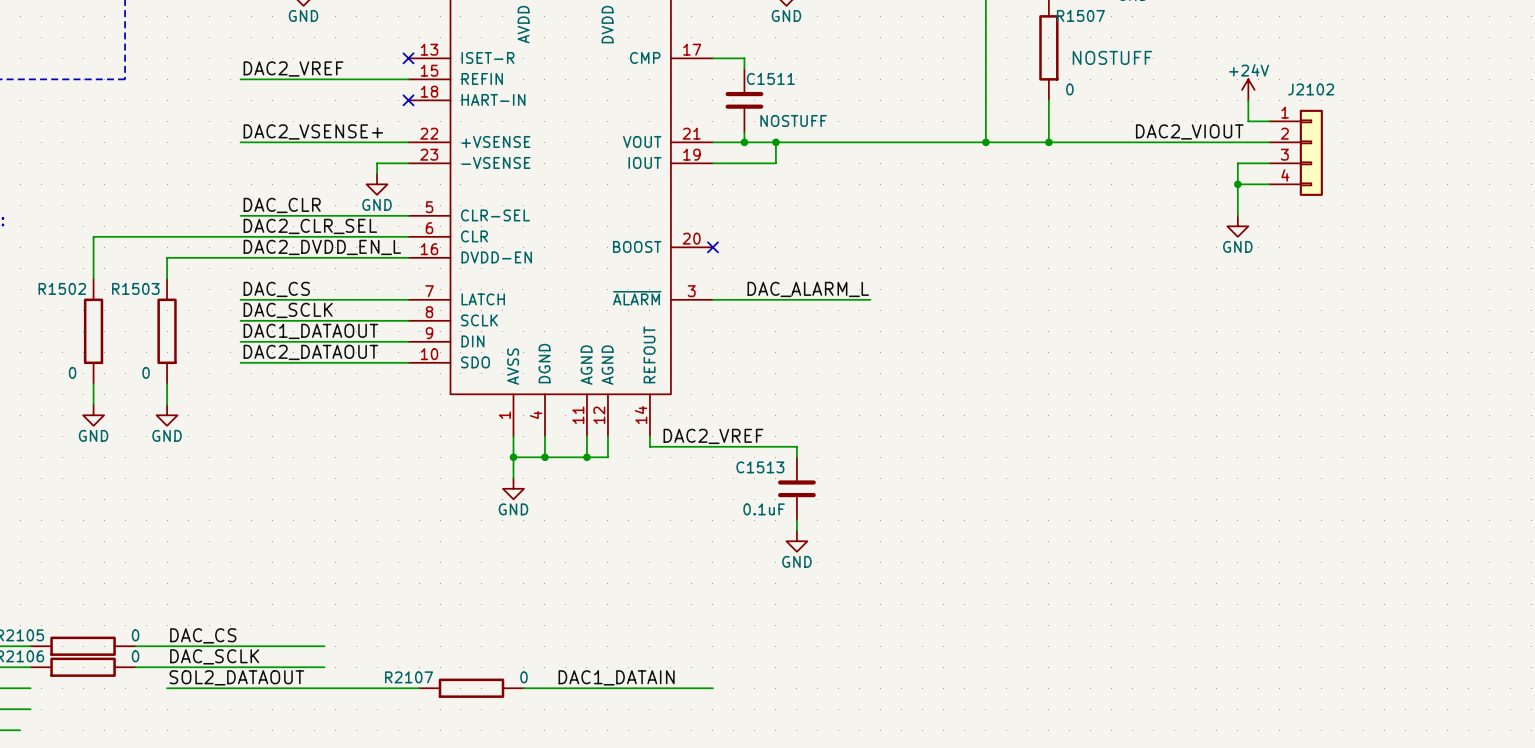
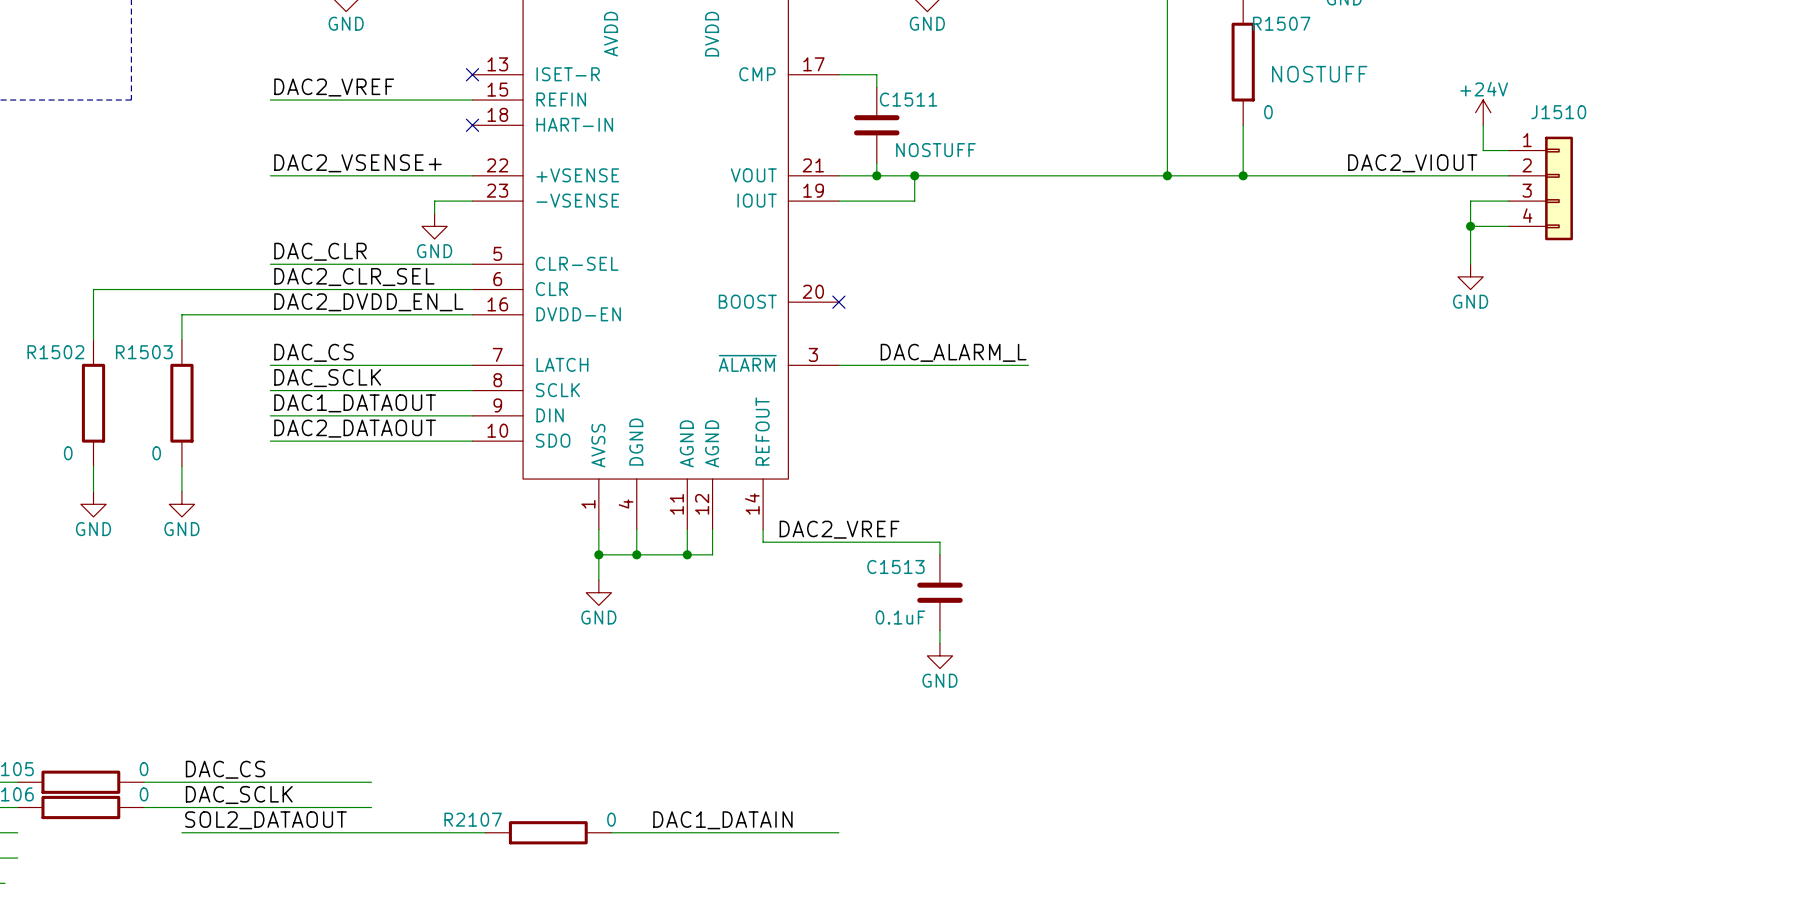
J2102 name: J2102 (1311, 89) -> J1510 (1558, 112)

